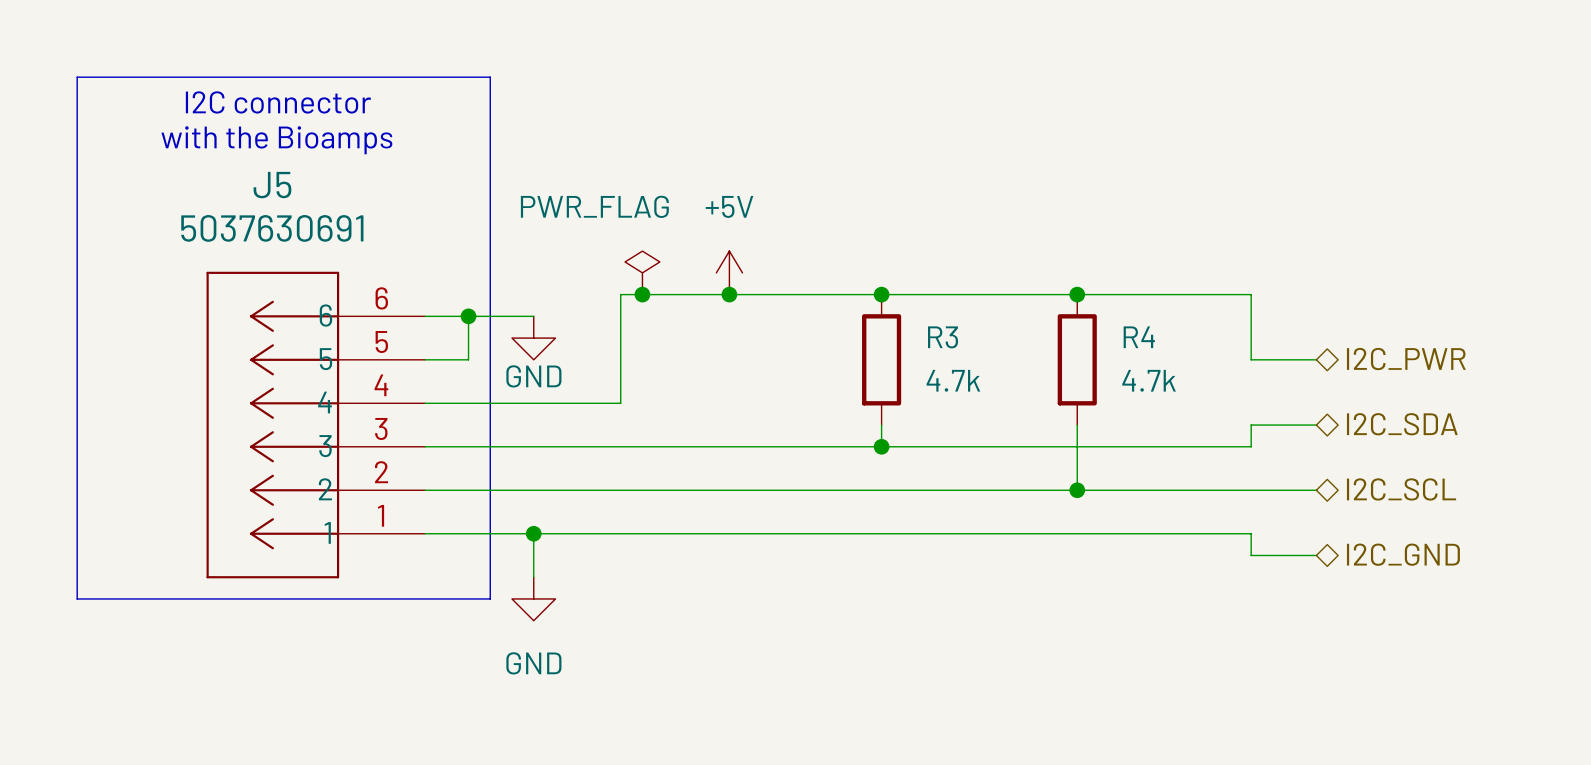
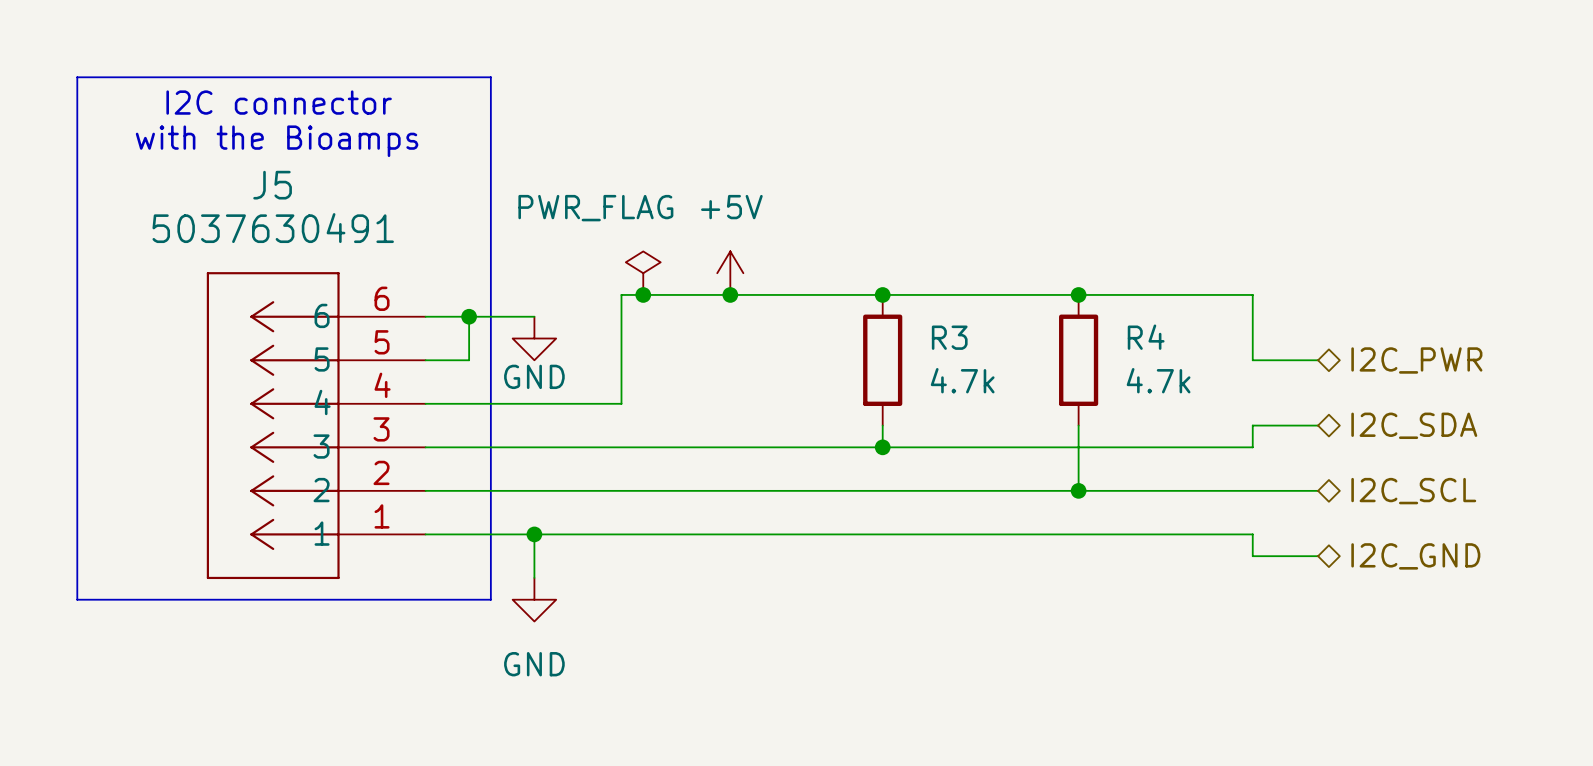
J5 value: 5037630691 (272, 228) -> 5037630491 (273, 228)

